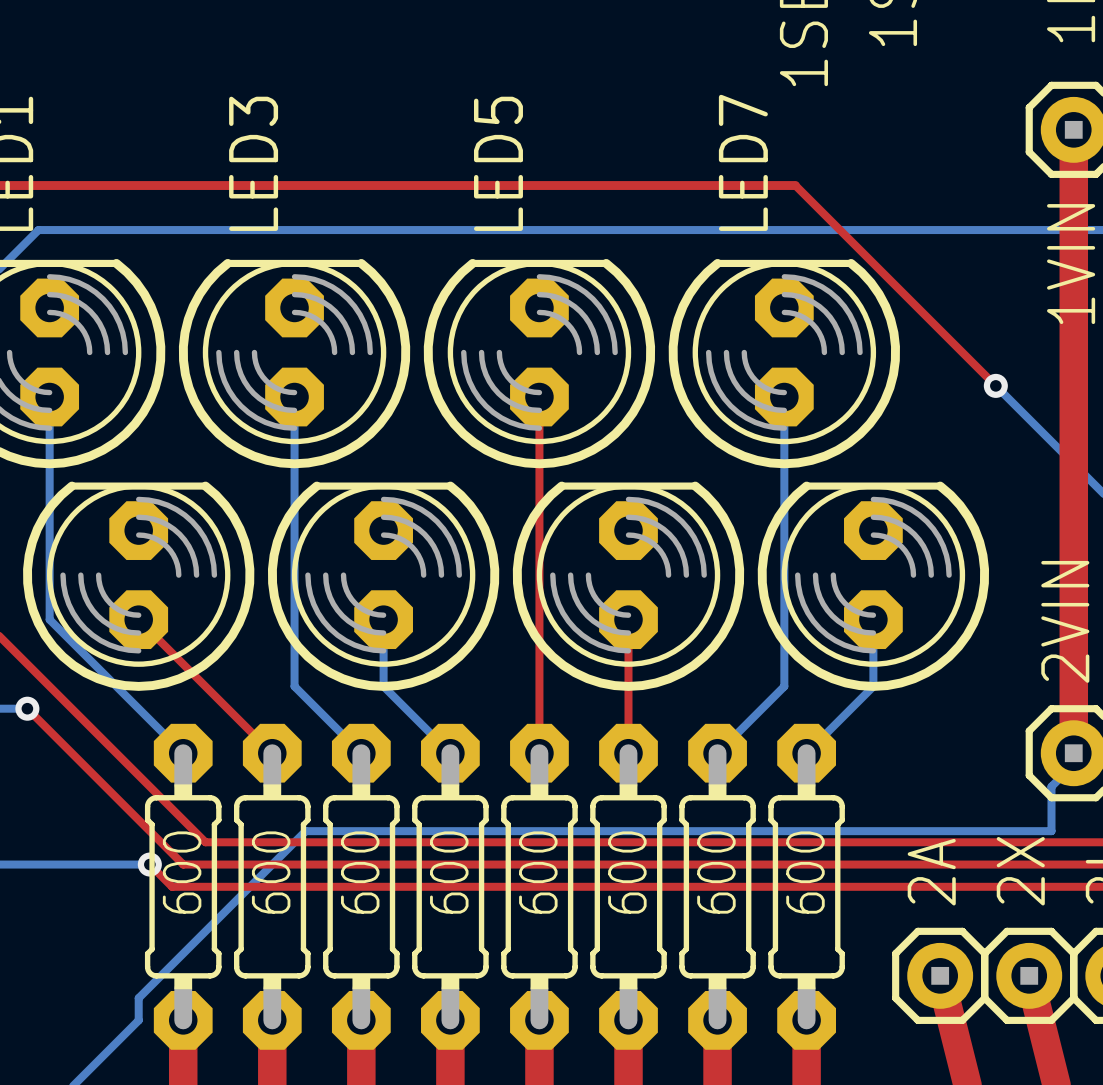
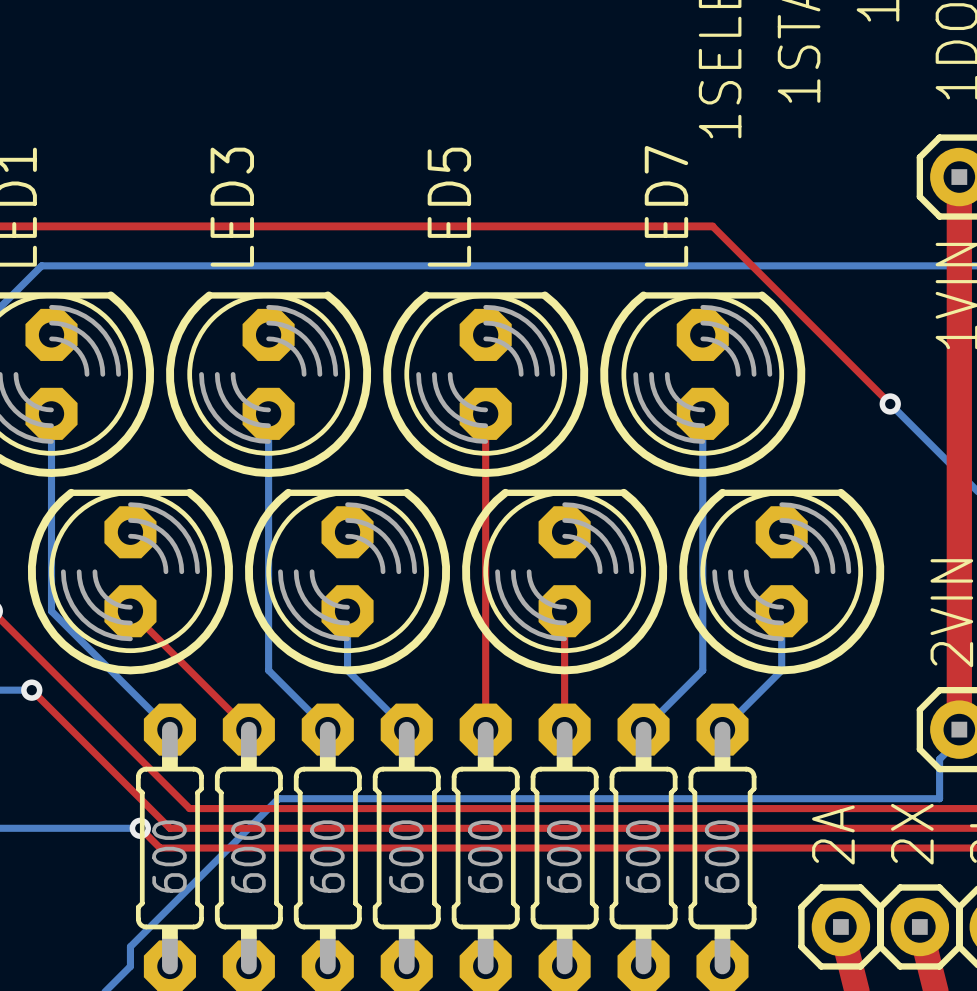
text: 600 (182, 872) -> none
text: 600 (271, 872) -> none
text: 600 (360, 872) -> none
text: 600 (449, 872) -> none
text: 600 (538, 872) -> none
text: 600 (627, 872) -> none
text: 600 (716, 872) -> none
text: 600 (805, 872) -> none
part value: none -> 600 (169, 856)
part value: none -> 600 (248, 856)
part value: none -> 600 (327, 856)
part value: none -> 600 (406, 856)
part value: none -> 600 (485, 856)
part value: none -> 600 (564, 856)
part value: none -> 600 (643, 856)
part value: none -> 600 (722, 856)

